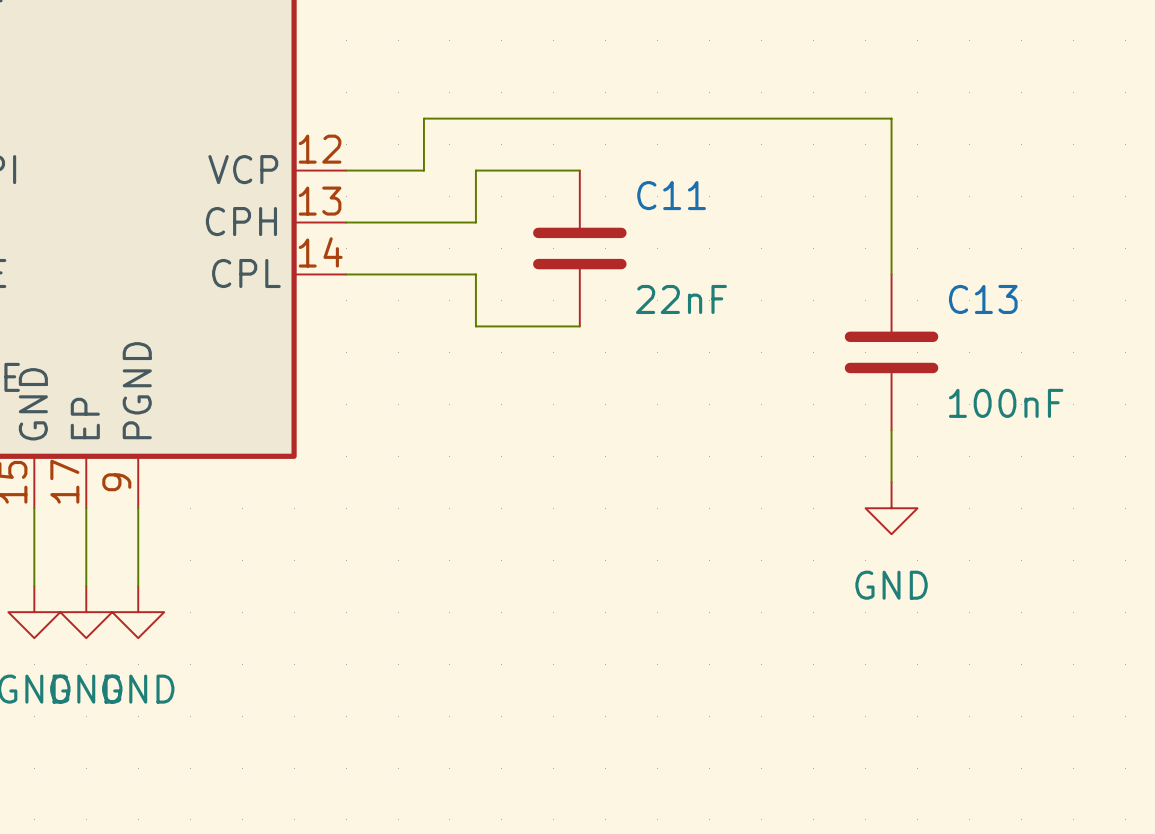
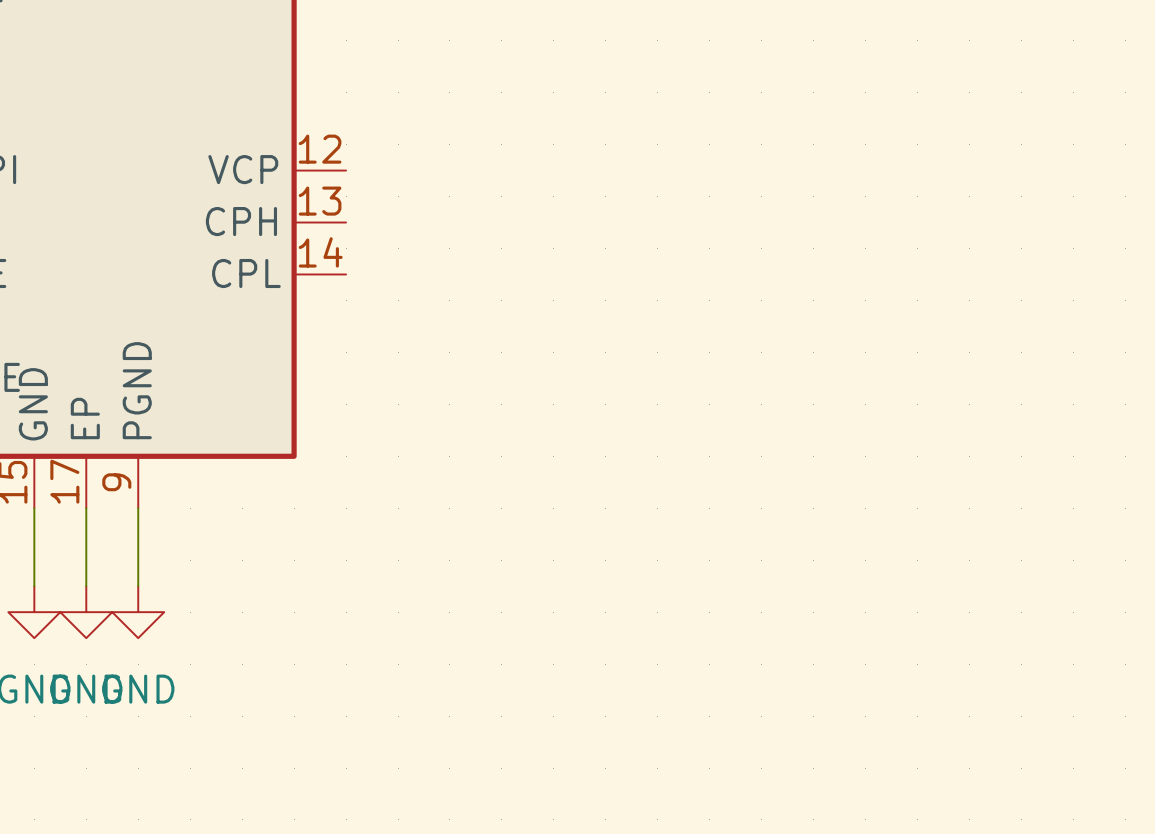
wire: (346, 170) (423, 170) (423, 118) (891, 118) (891, 274) -> none
wire: (579, 170) (475, 170) (475, 222) (346, 222) -> none
C11: 22nF (579, 248) -> none
wire: (346, 274) (475, 274) (475, 326) (579, 326) -> none
C13: 100nF (891, 352) -> none
wire: (891, 430) (891, 482) -> none
power symbol: GND (891, 508) -> none

